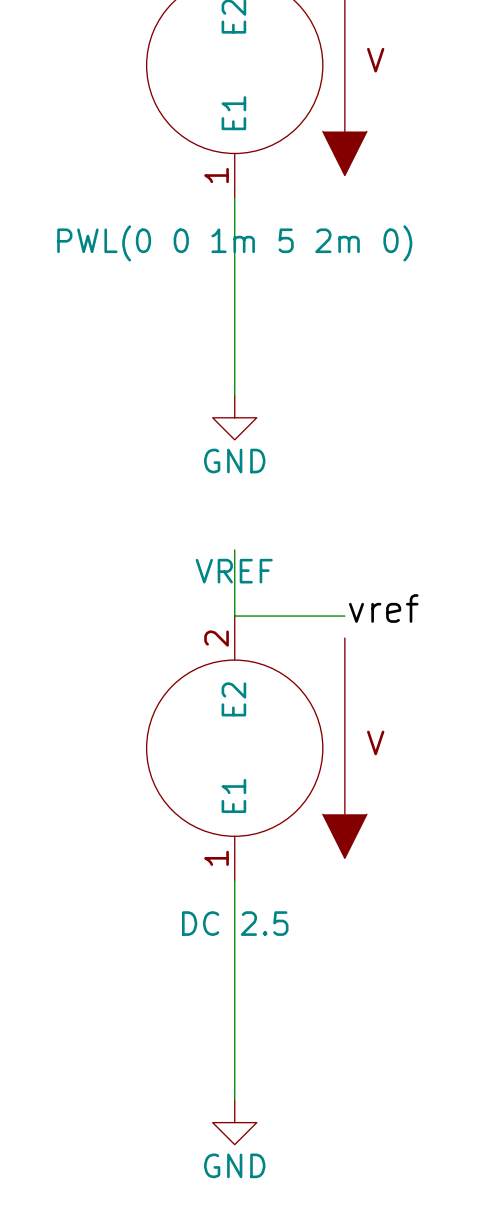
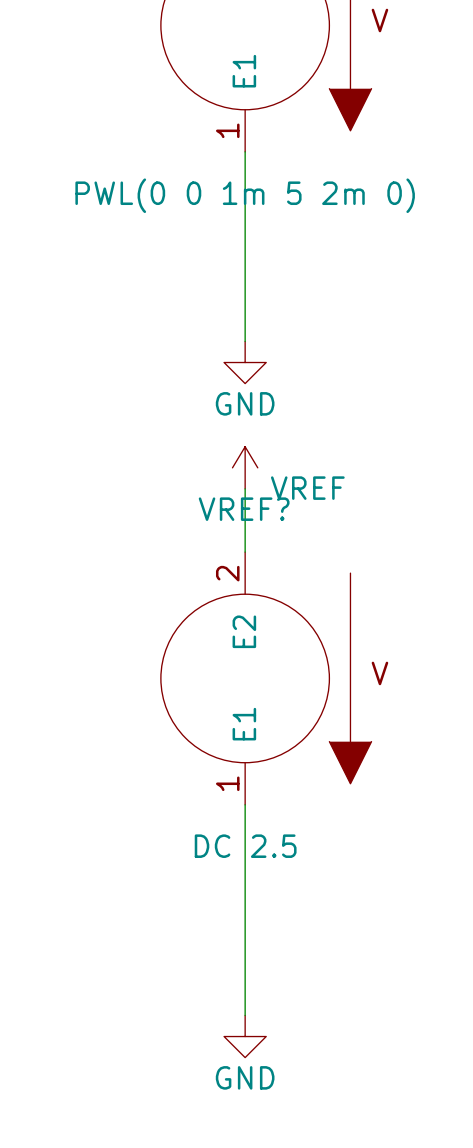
power symbol: none -> VREF (245, 467)
VREF name: VREF (234, 571) -> VREF? (244, 509)
label: vref (383, 608) -> none
wire: (234, 616) (344, 616) -> none

